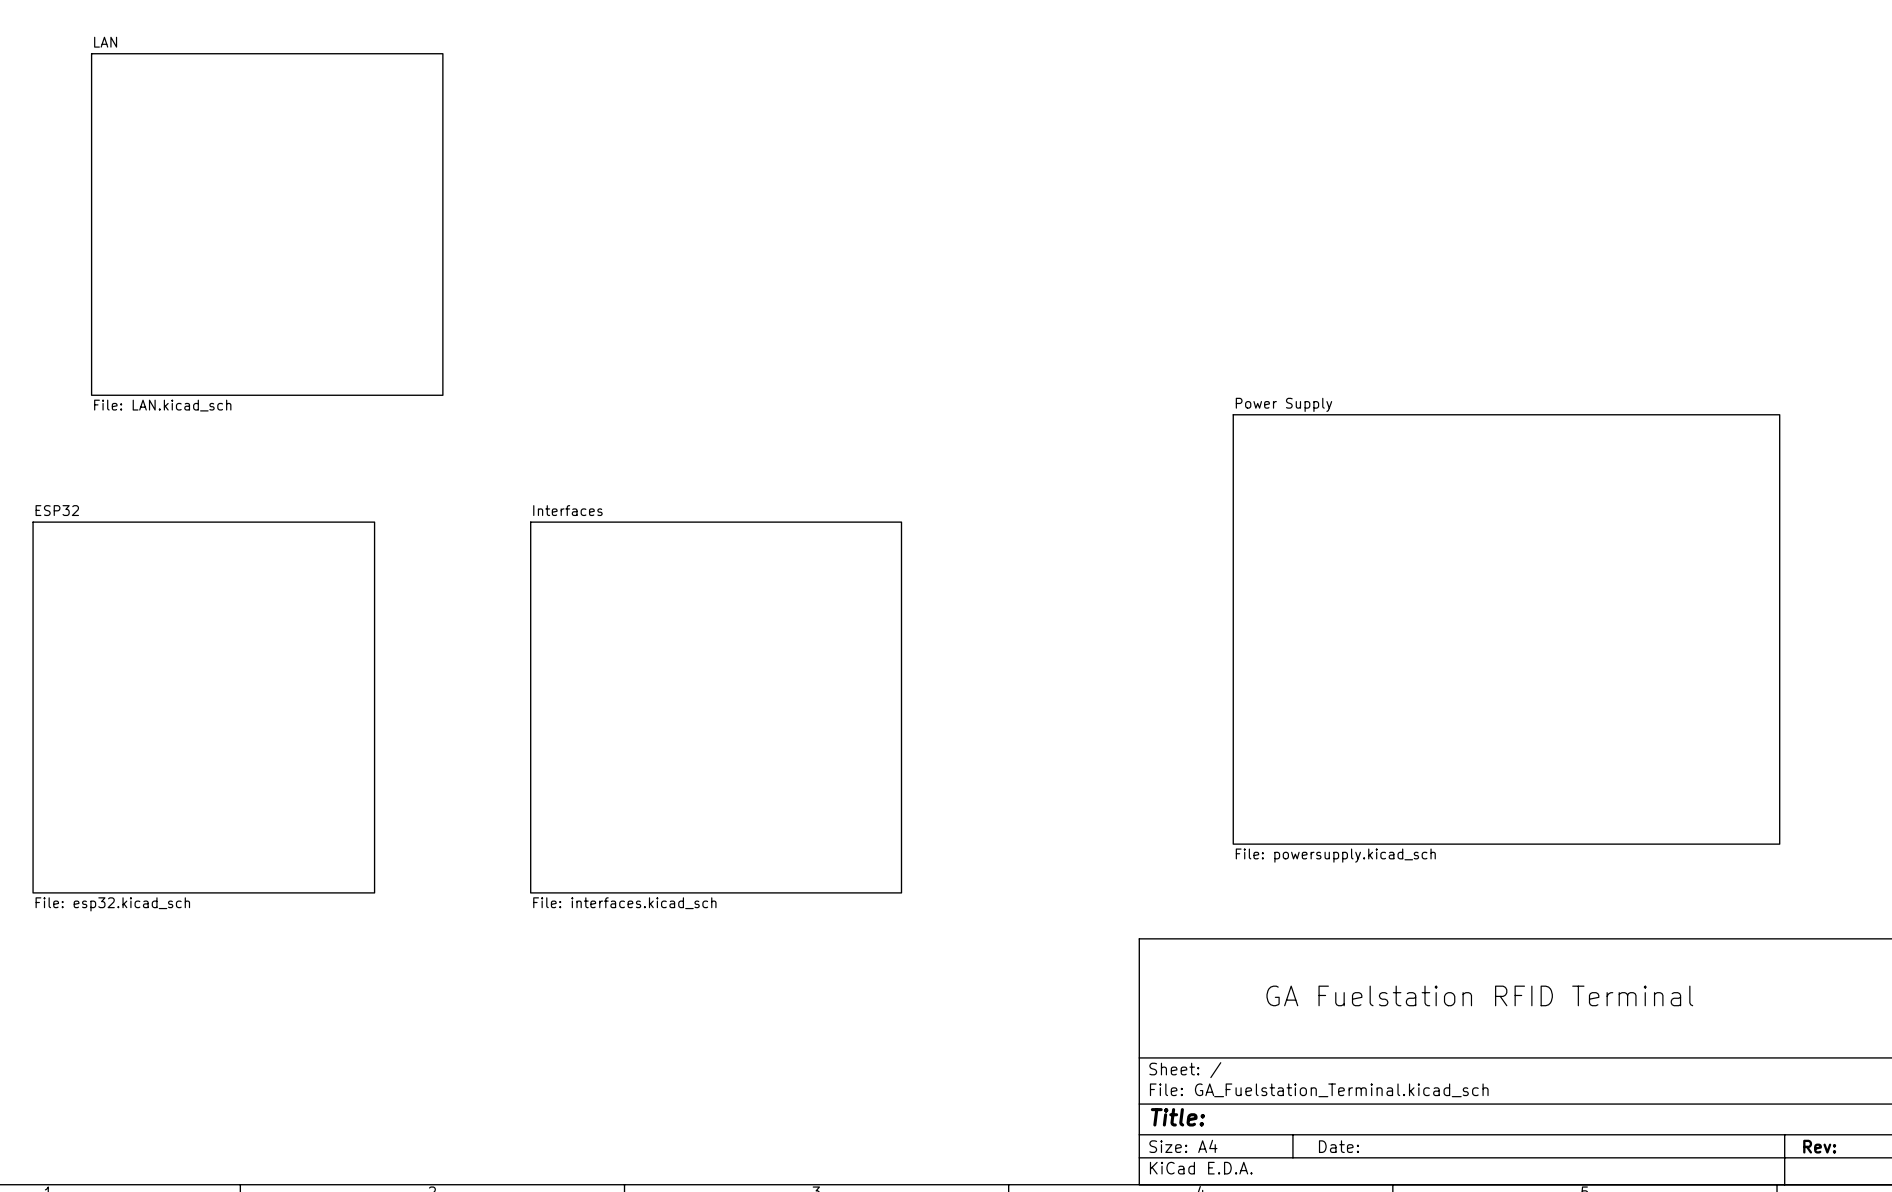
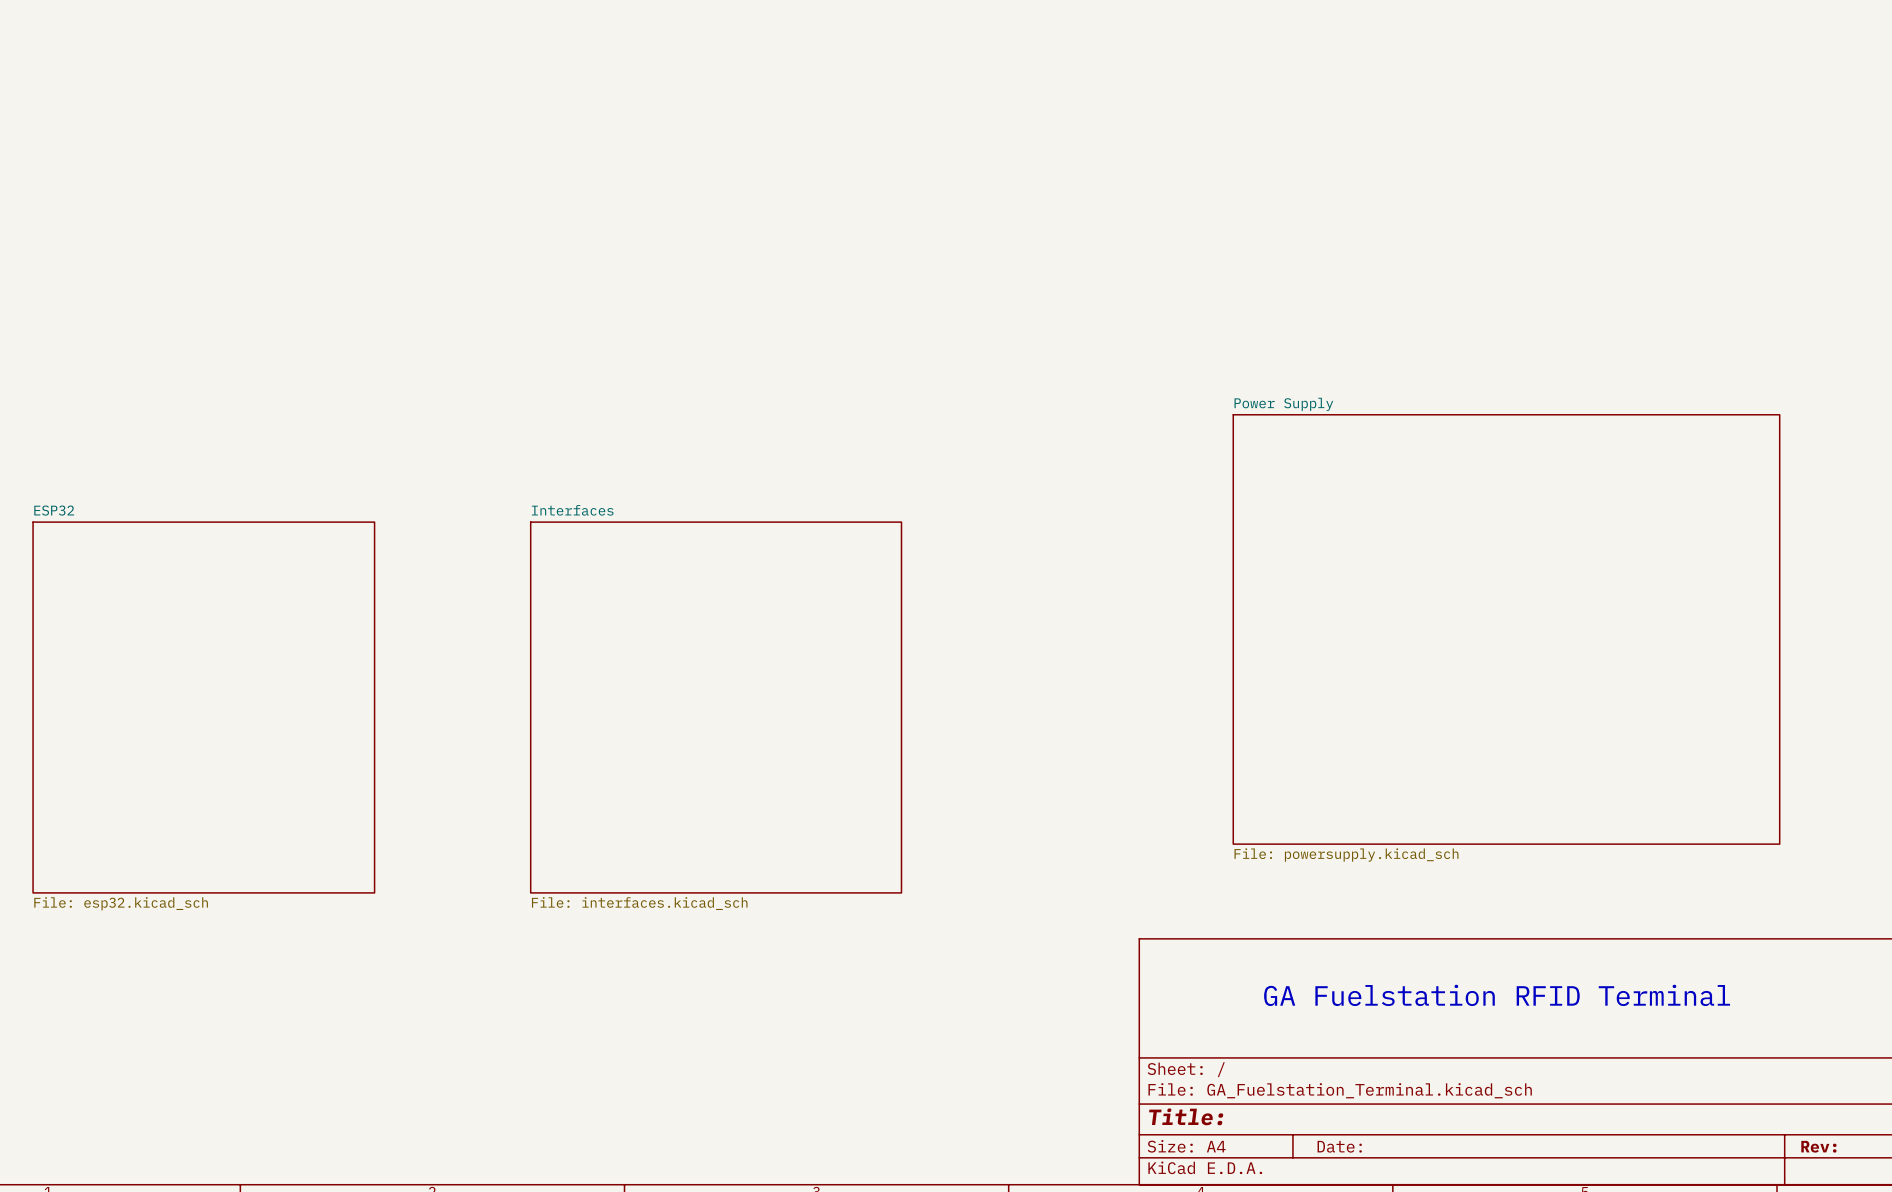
sheet LAN: File: LAN.kicad_sch (267, 224) -> none

